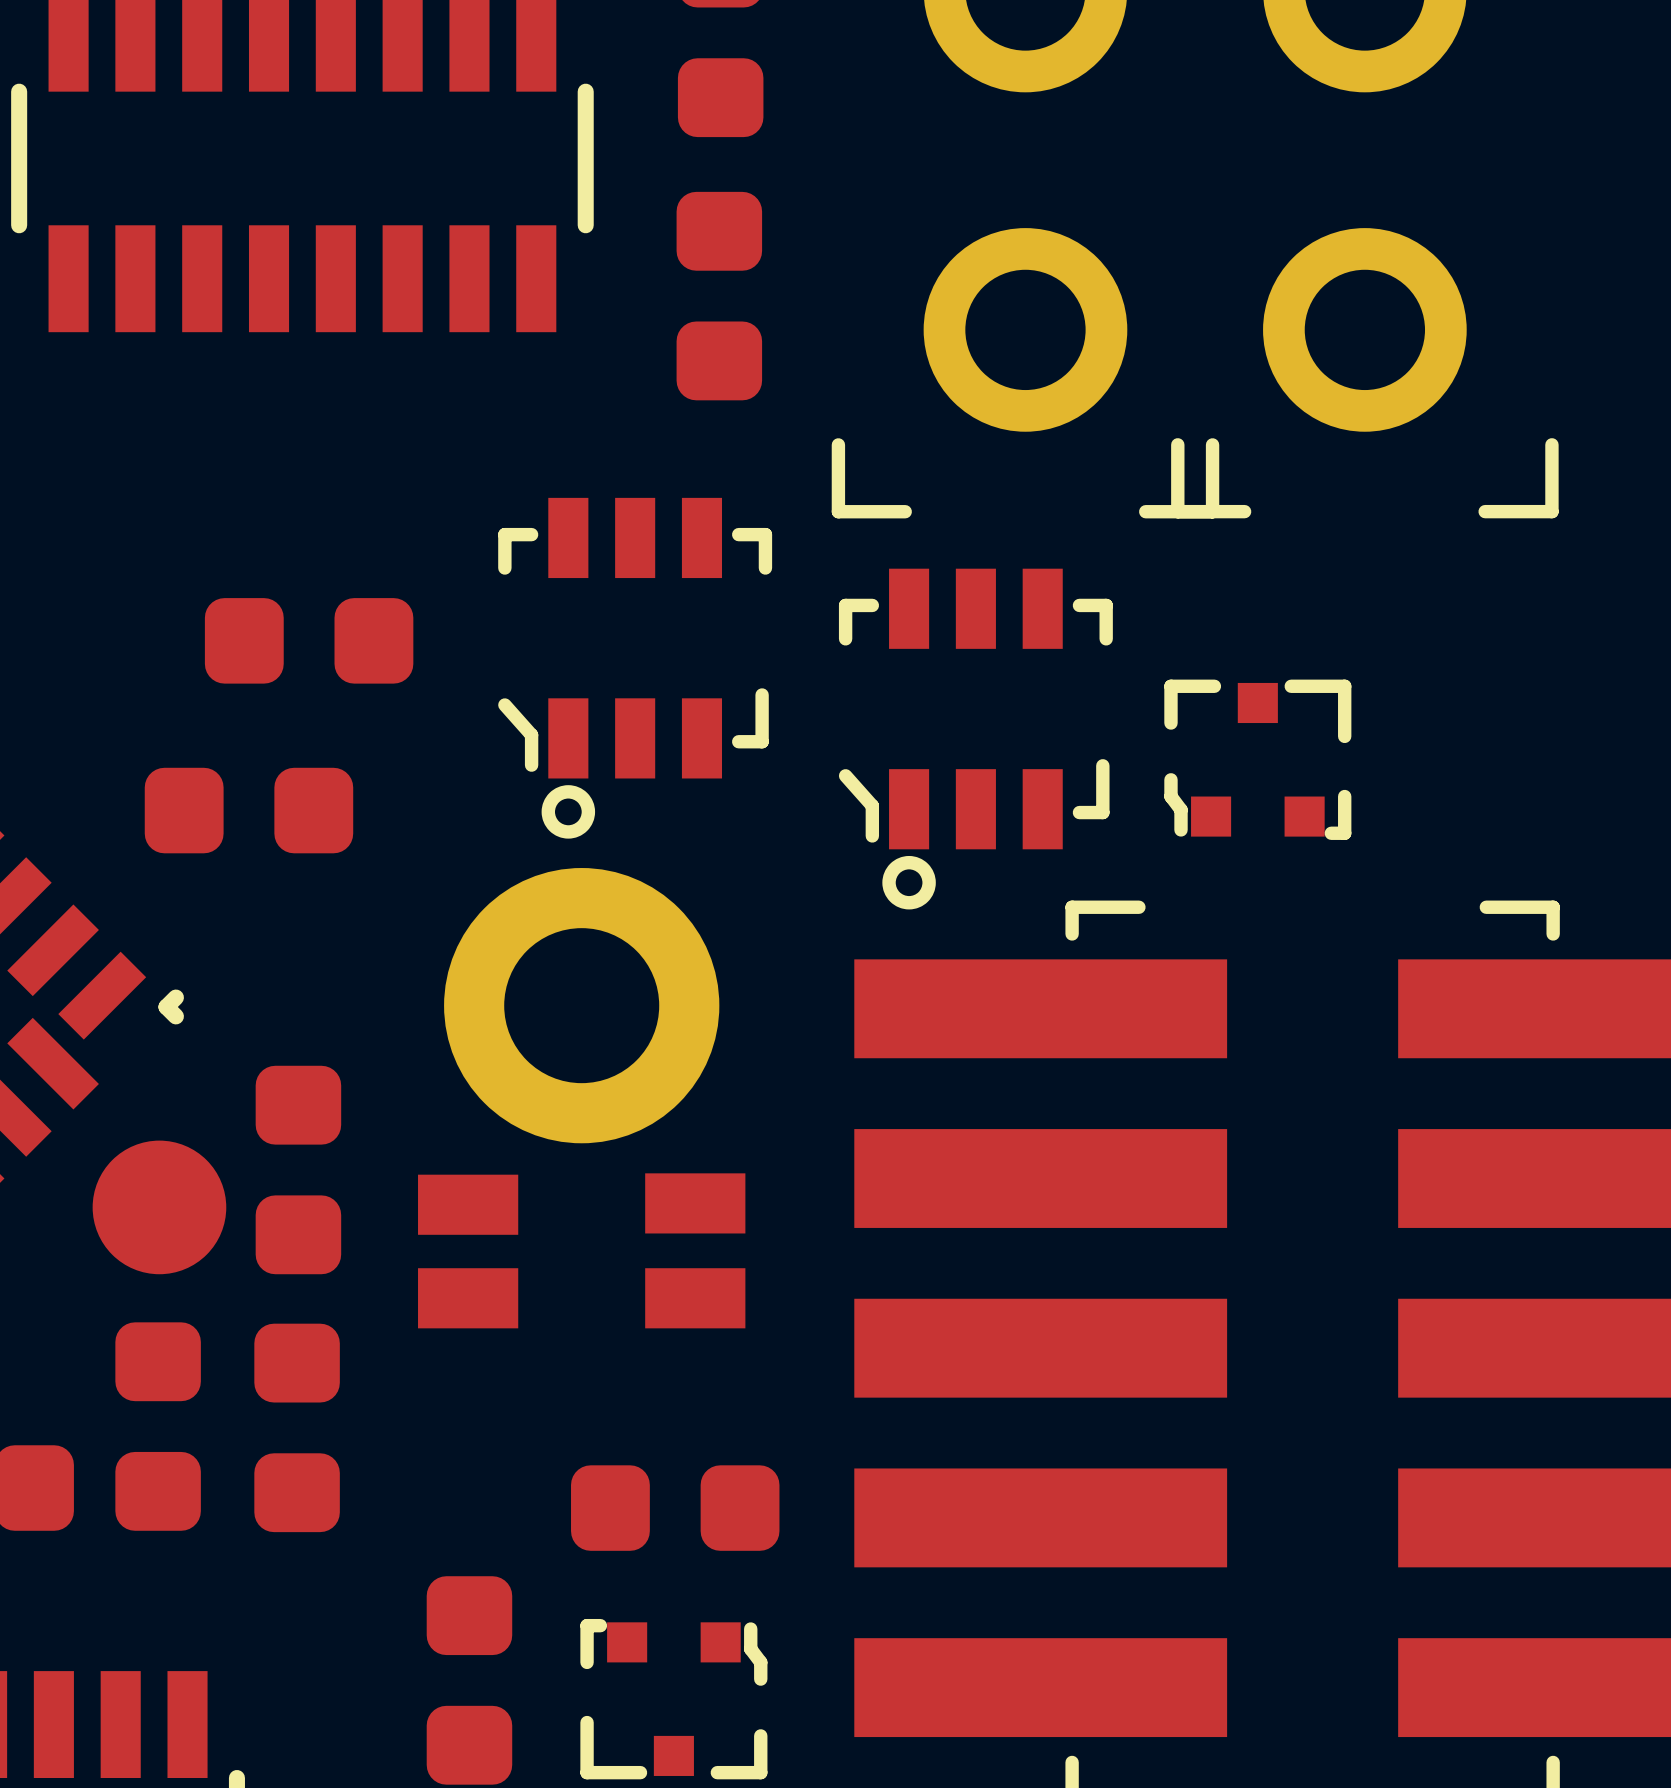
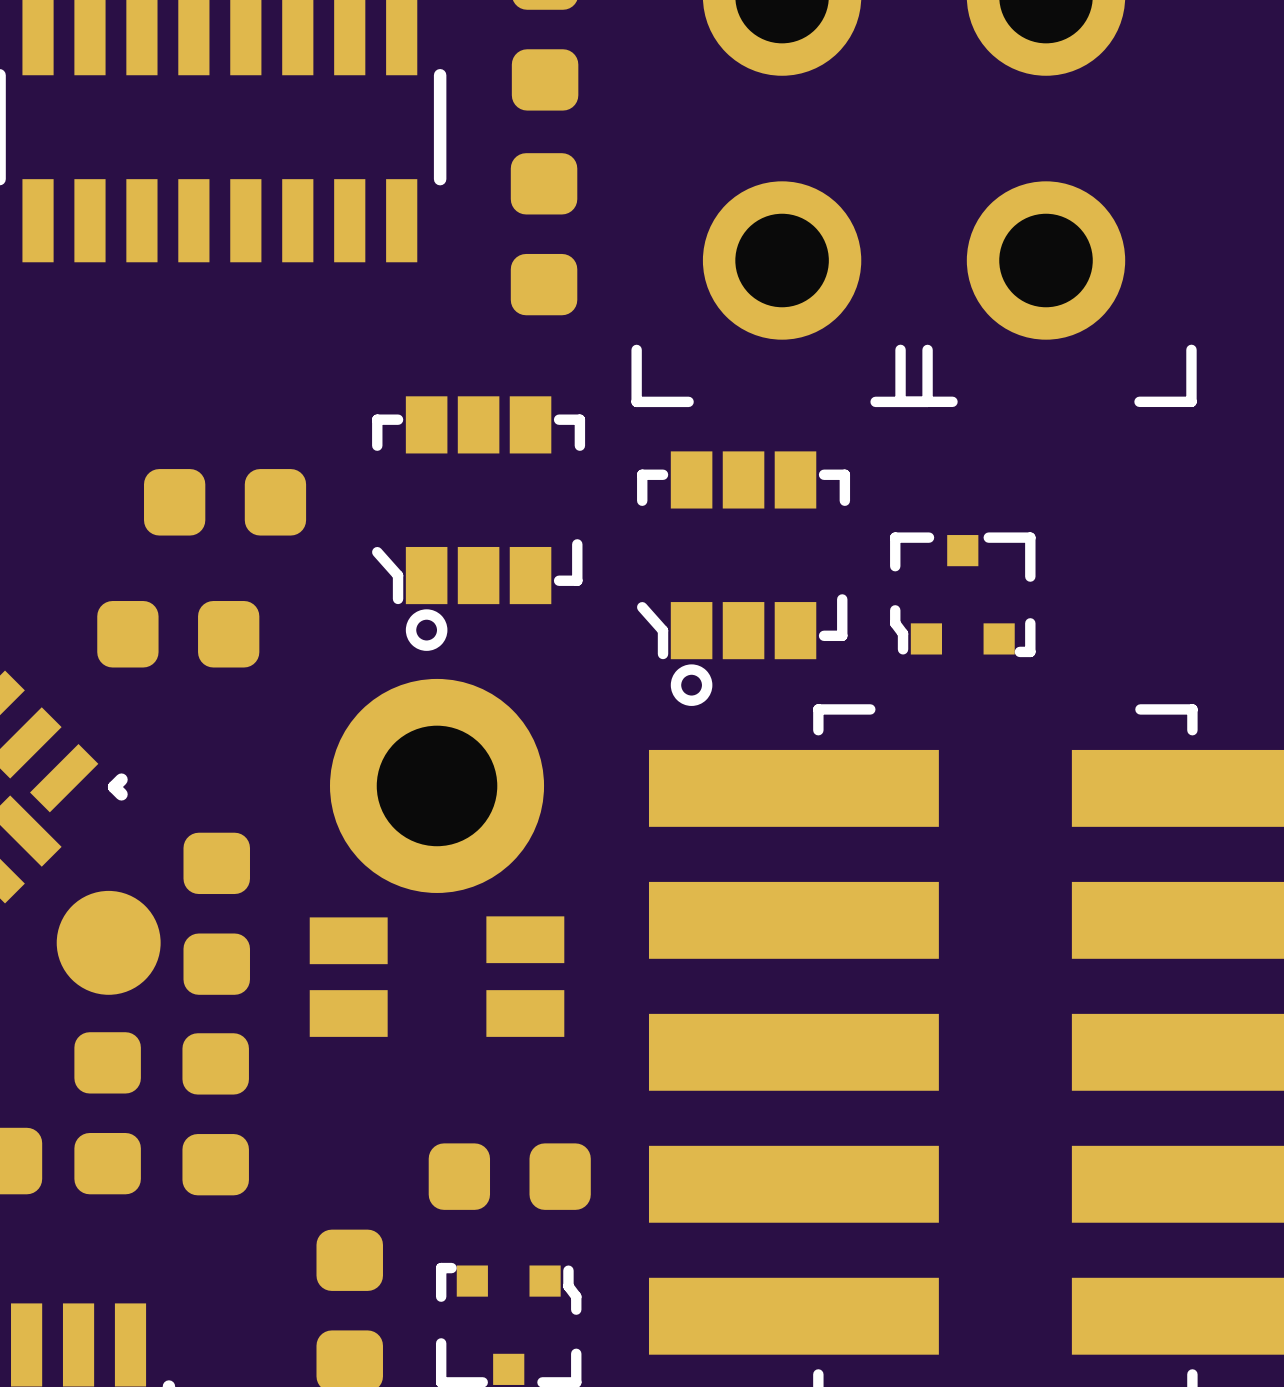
part footprint: [498, 497, 773, 839] -> [372, 396, 586, 651]
part footprint: [838, 568, 1113, 910] -> [637, 451, 851, 706]

